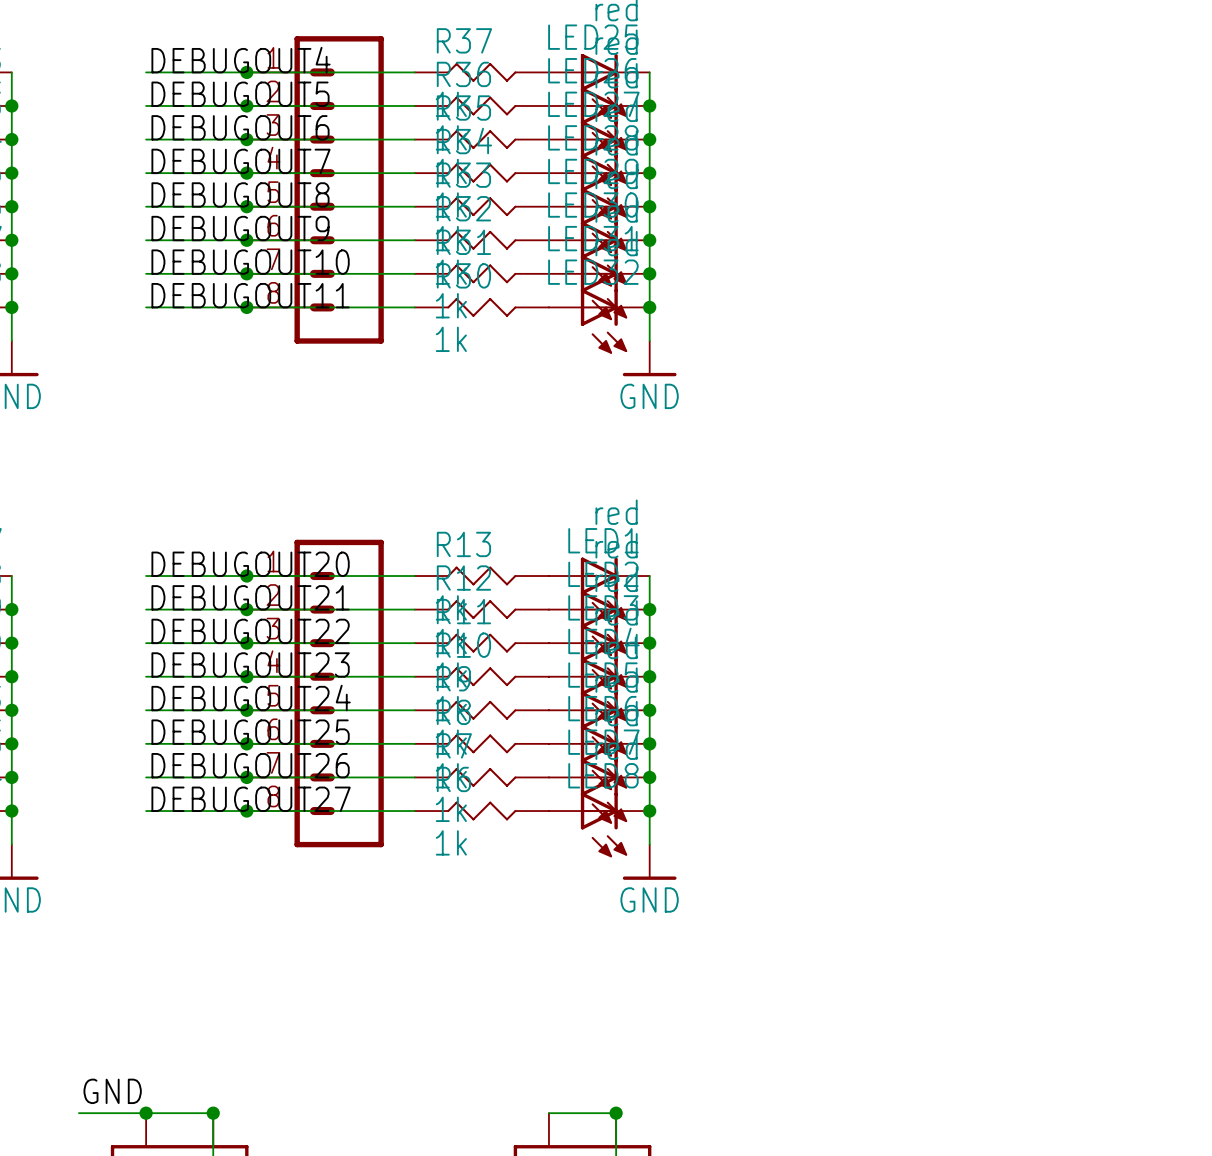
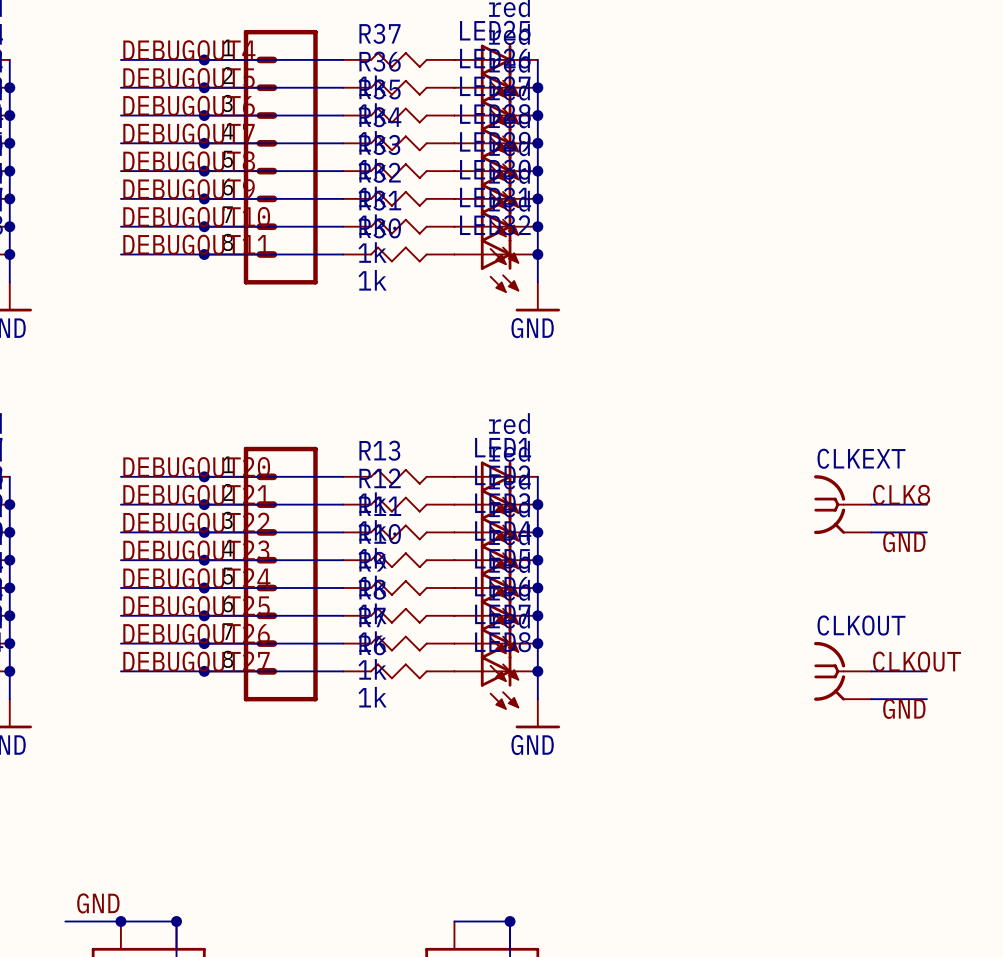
label: none -> CLK8 (901, 494)
CLKEXT: none -> (842, 504)
wire: none -> (871, 504) (926, 504)
wire: none -> (871, 532) (926, 532)
label: none -> GND (904, 542)
label: none -> CLKOUT (917, 661)
CLKOUT: none -> (842, 671)
wire: none -> (871, 671) (926, 671)
wire: none -> (871, 699) (926, 699)
label: none -> GND (904, 708)

